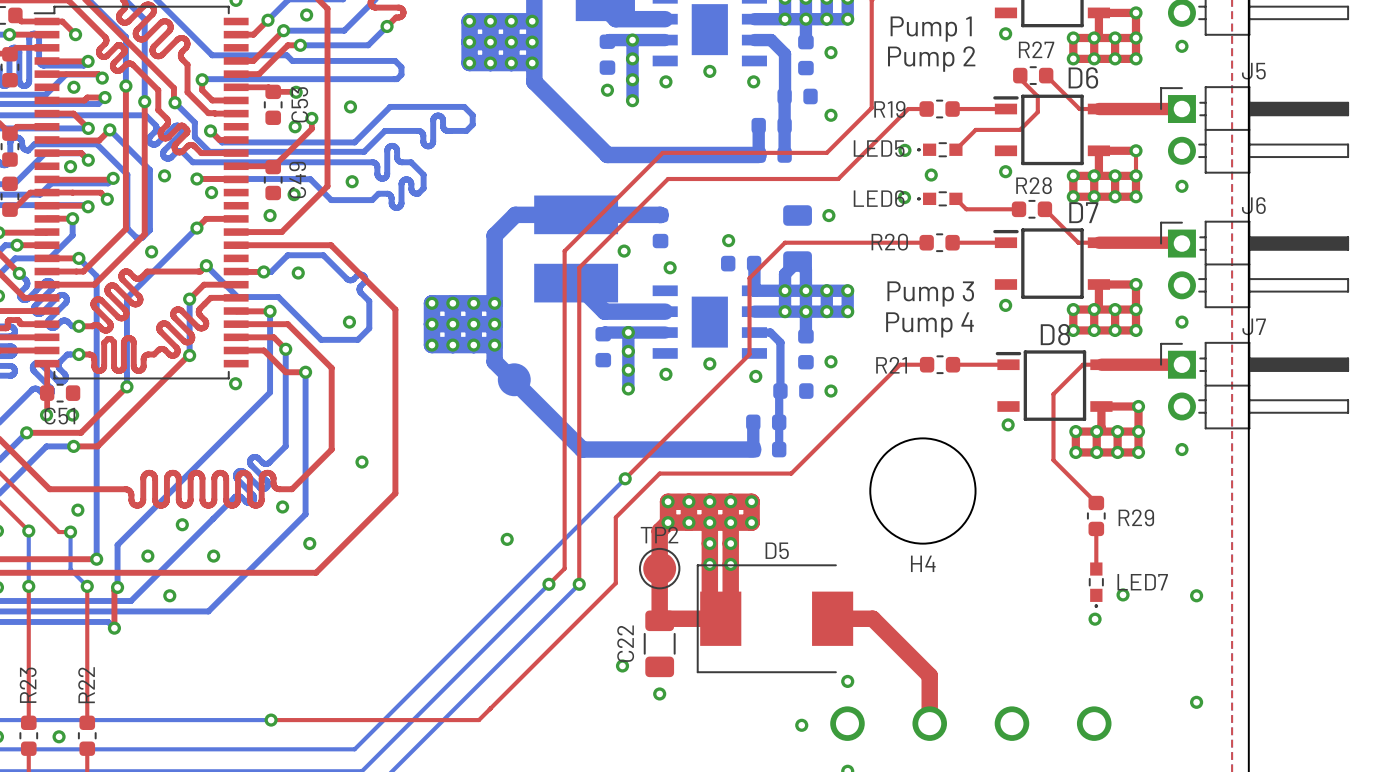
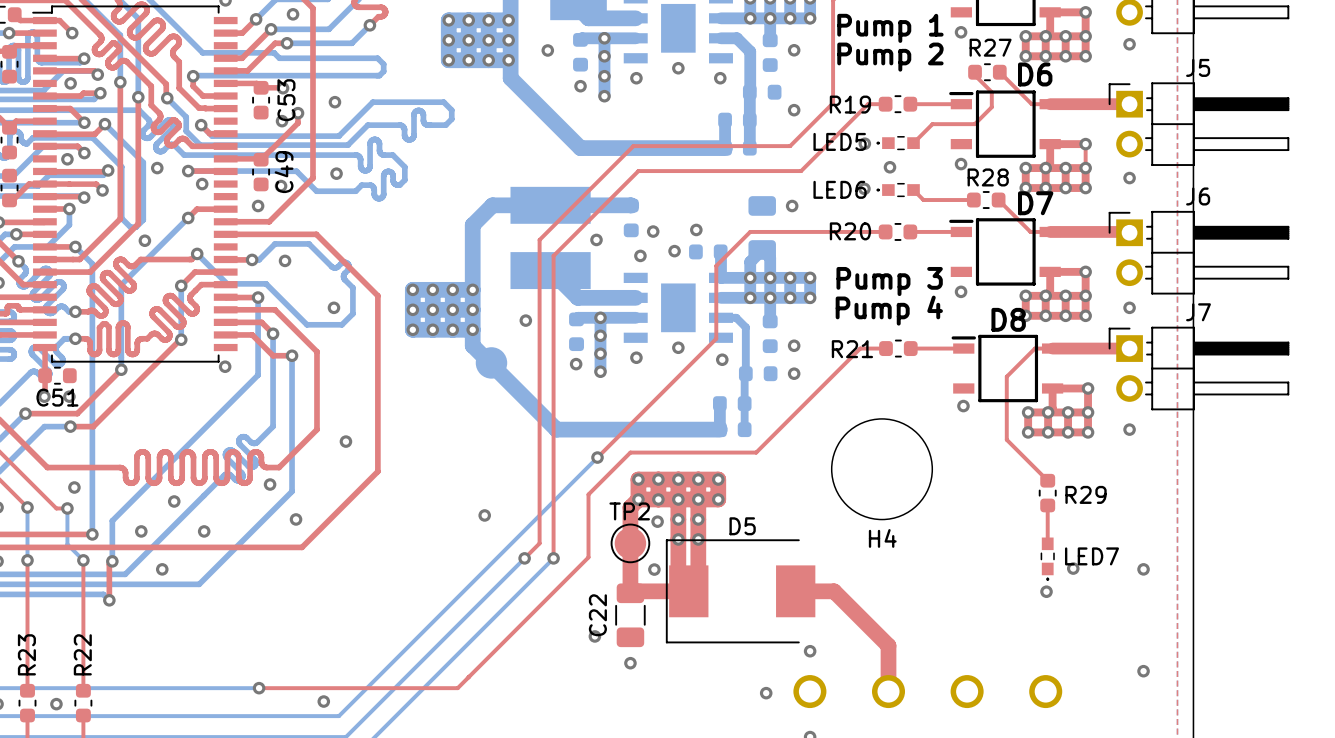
via: none -> (547, 50)
via: none -> (653, 231)
via: none -> (674, 251)
via: none -> (525, 320)
via: none -> (576, 364)
via: none -> (657, 521)
via: none -> (654, 569)
via: none -> (323, 701)

